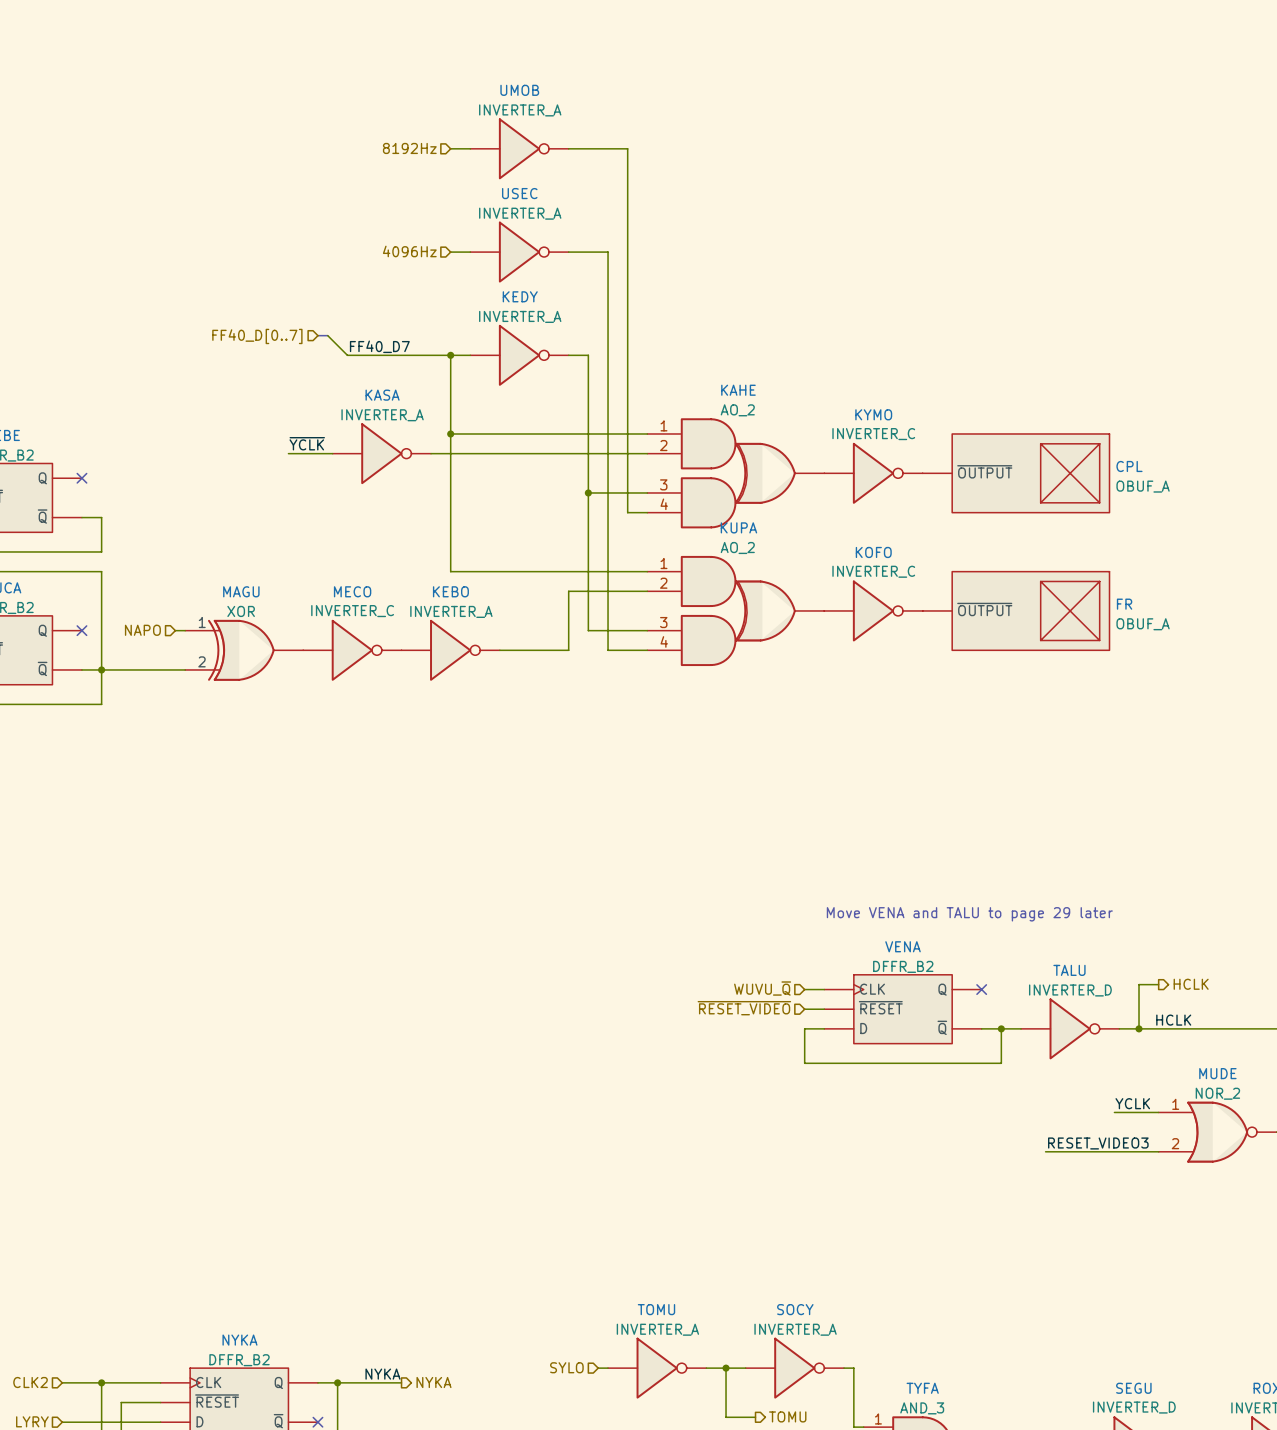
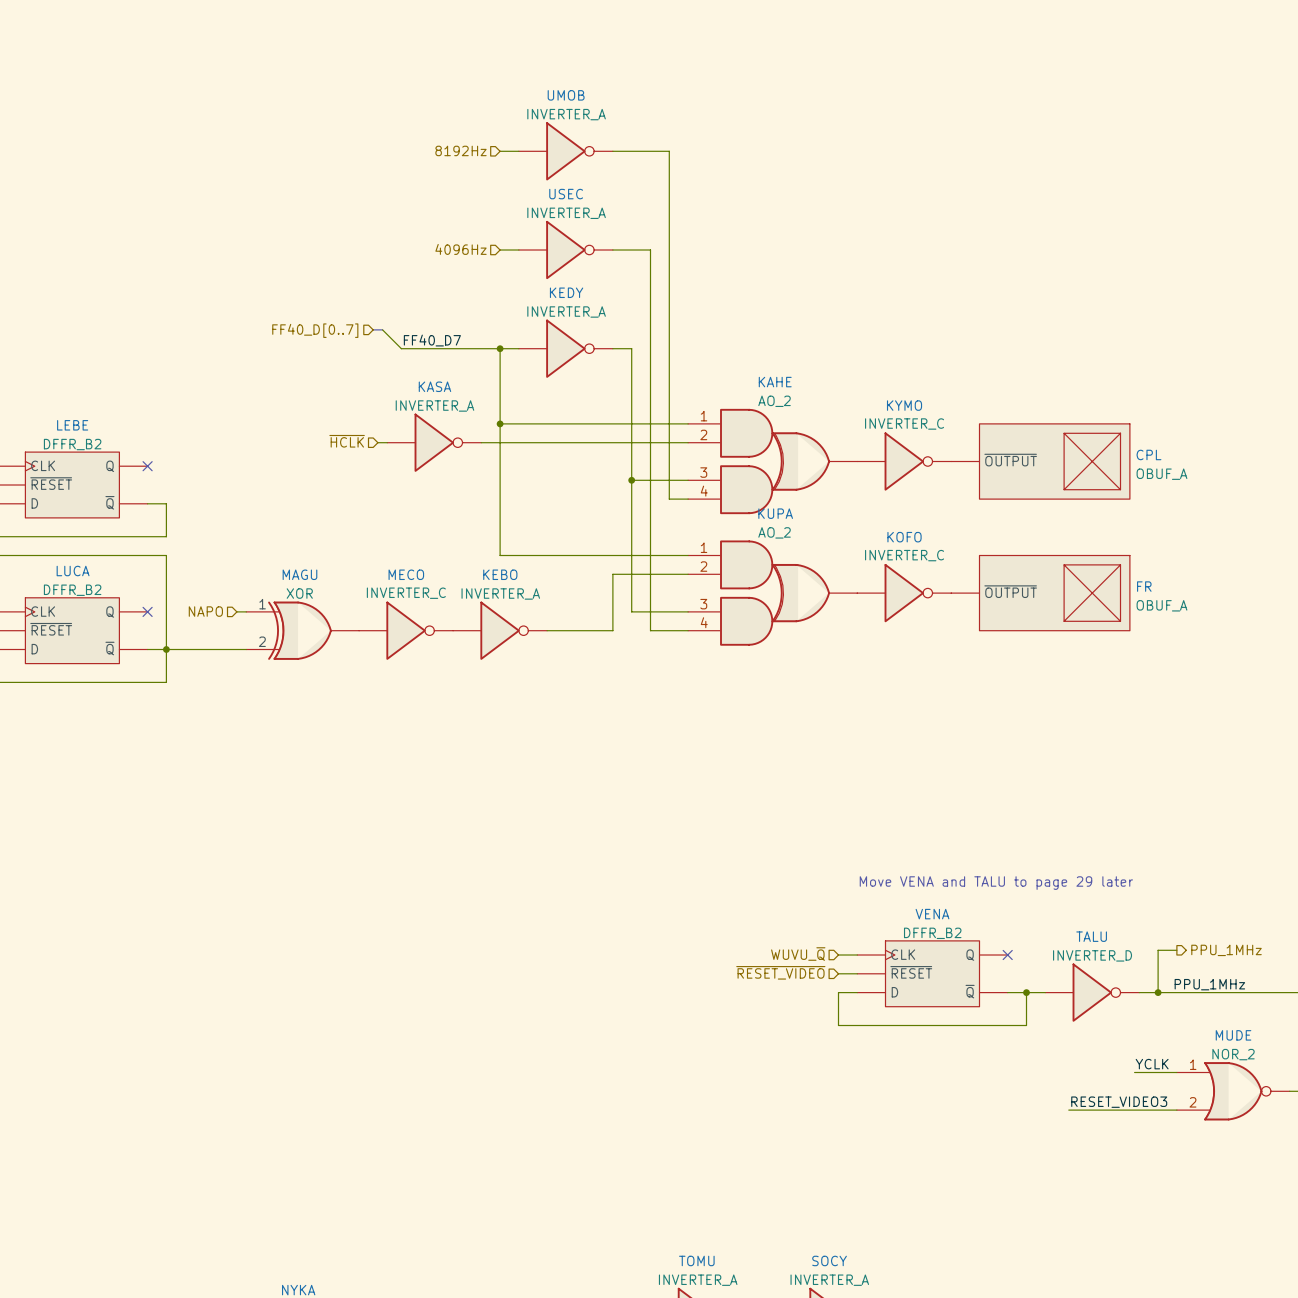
label: ~{YCLK} (307, 443) -> none
hierarchical label: none -> ~{HCLK} (347, 441)
wire: (288, 453) (322, 453) -> none
hierarchical label: HCLK (1191, 984) -> PPU_1MHz (1226, 950)
label: HCLK (1173, 1020) -> PPU_1MHz (1209, 984)

